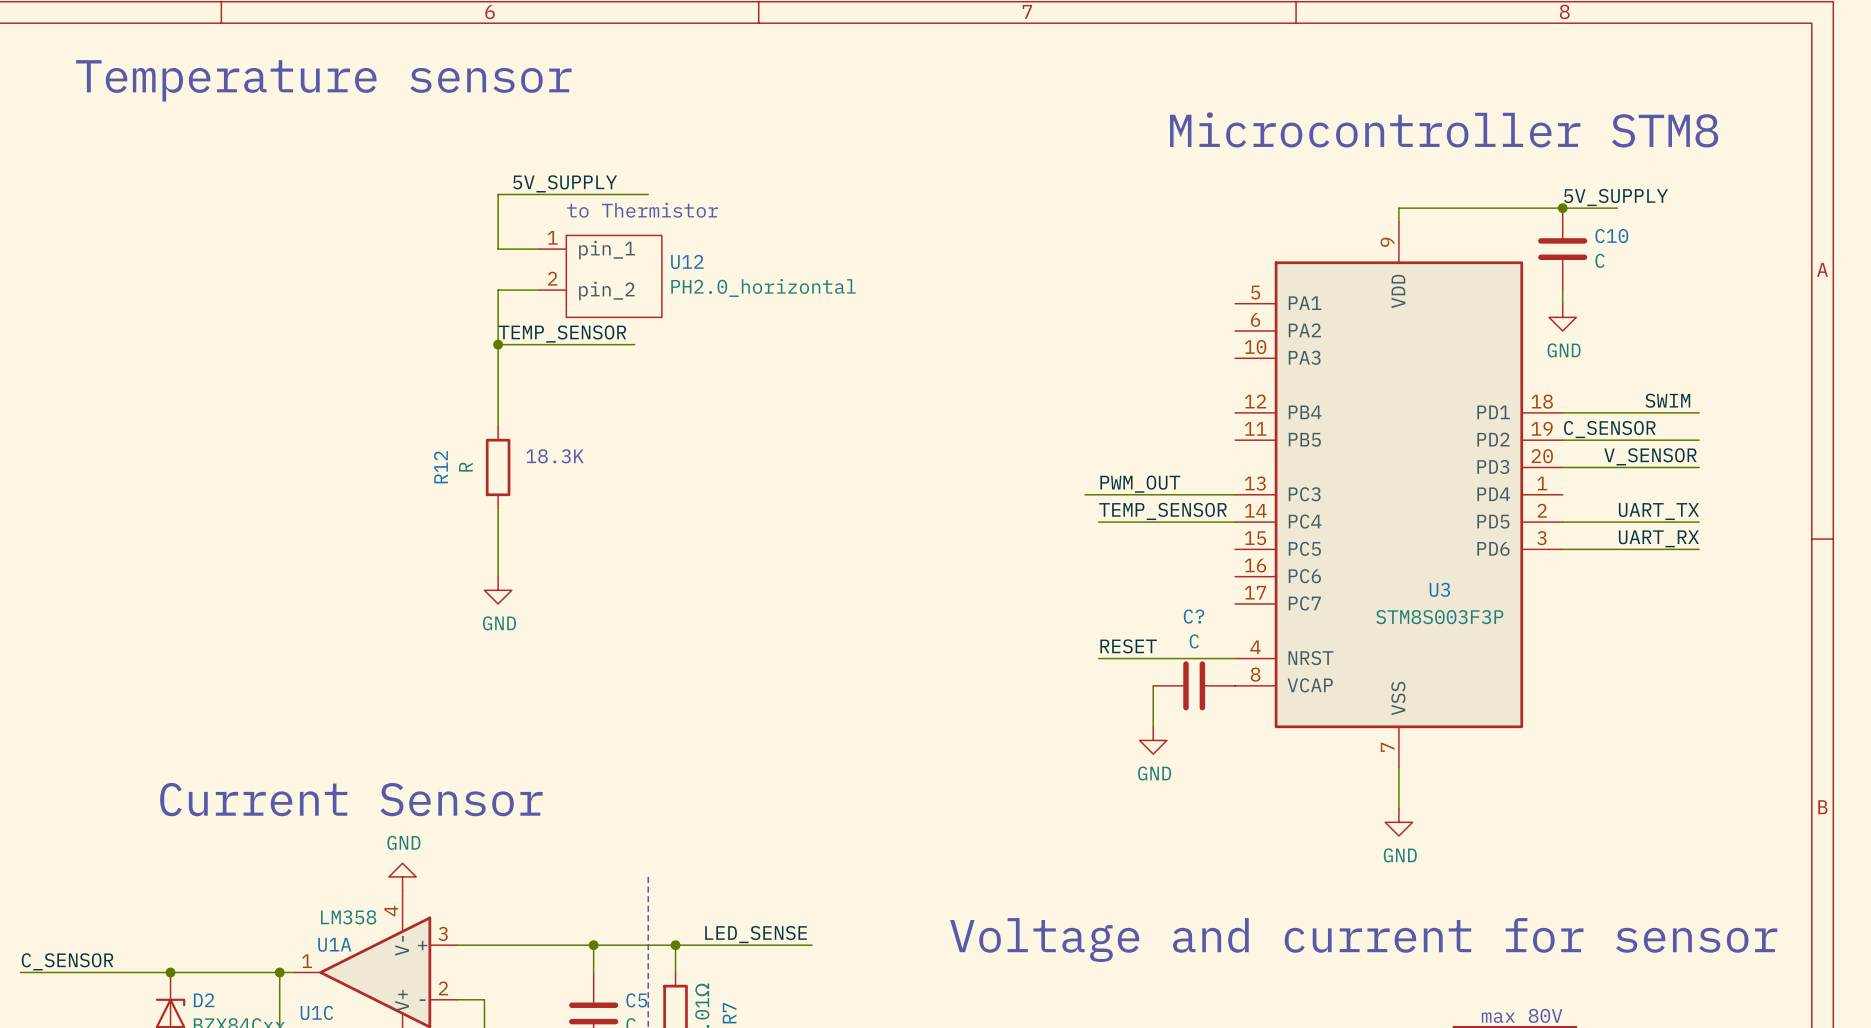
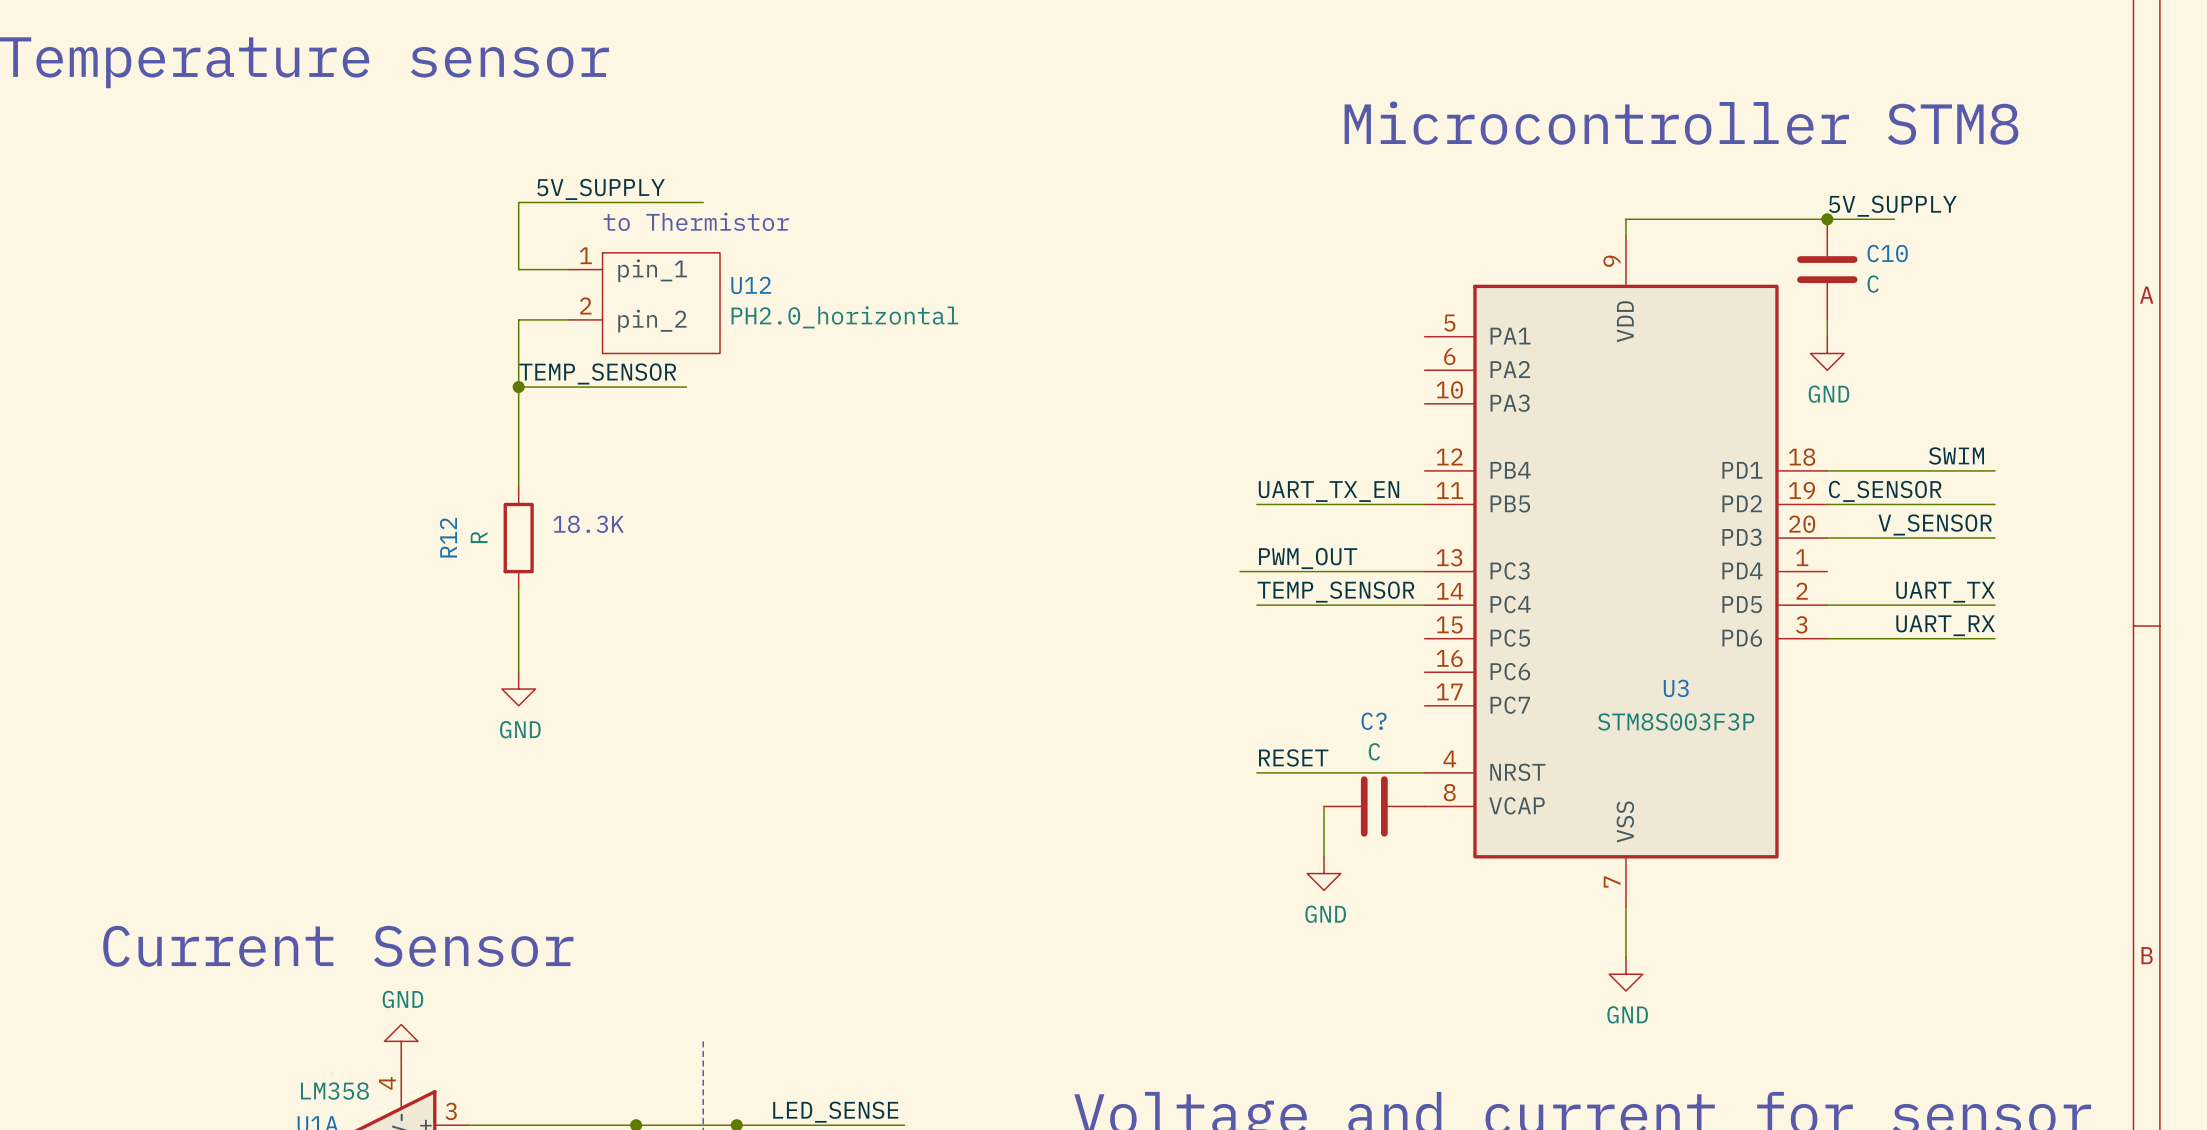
label: none -> UART_TX_EN (1328, 491)
wire: none -> (1256, 504) (1424, 504)

